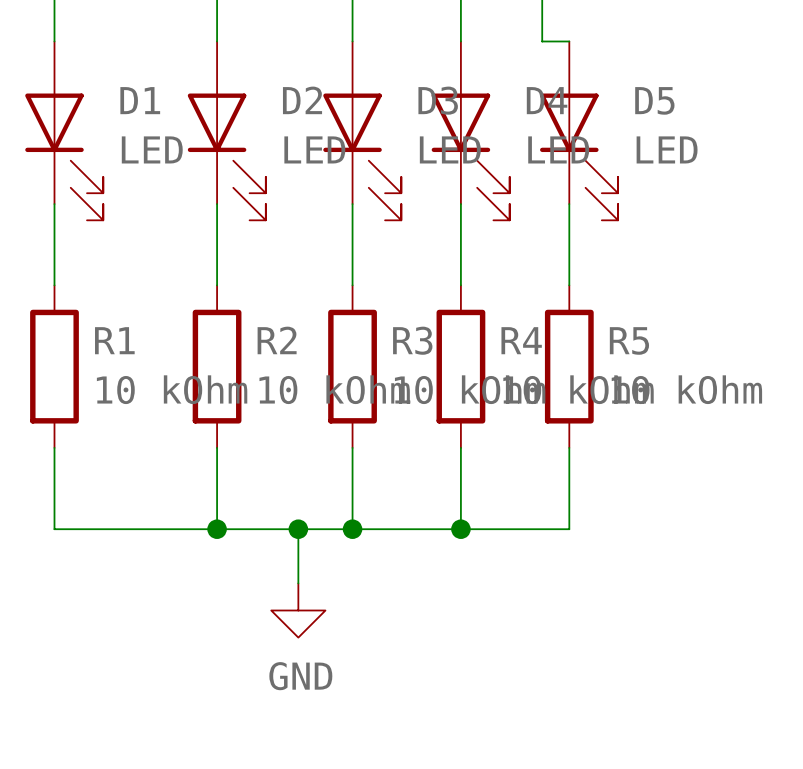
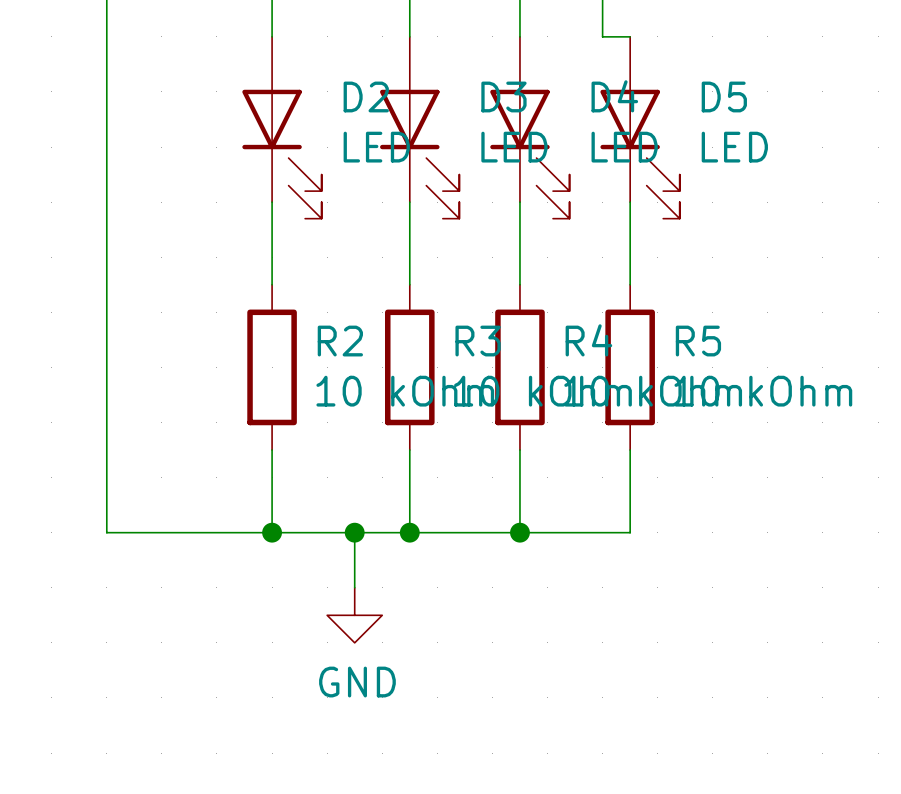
D1: LED (64, 130) -> none
wire: none -> (106, 284) (106, 450)
R1: 10 kOhm (54, 366) -> none

